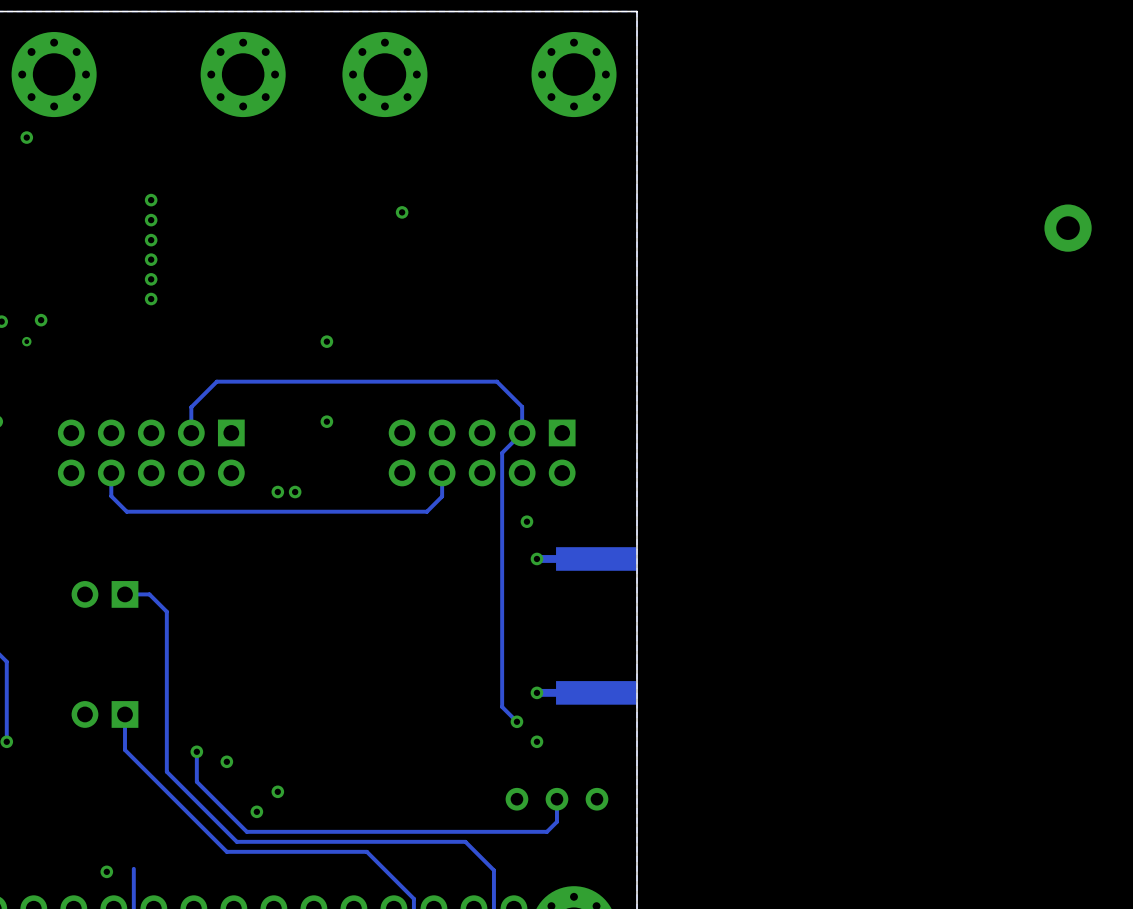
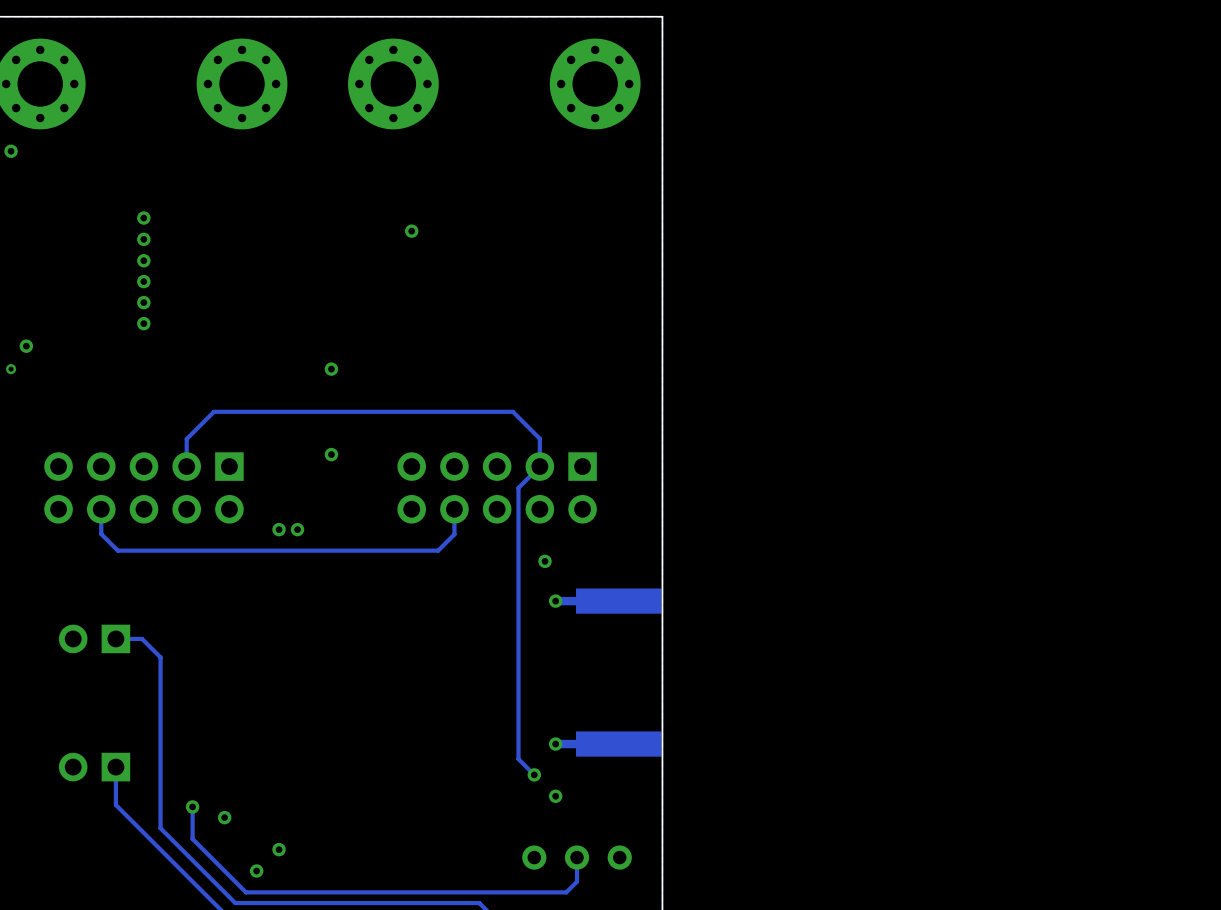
part: (1068, 228) -> none

